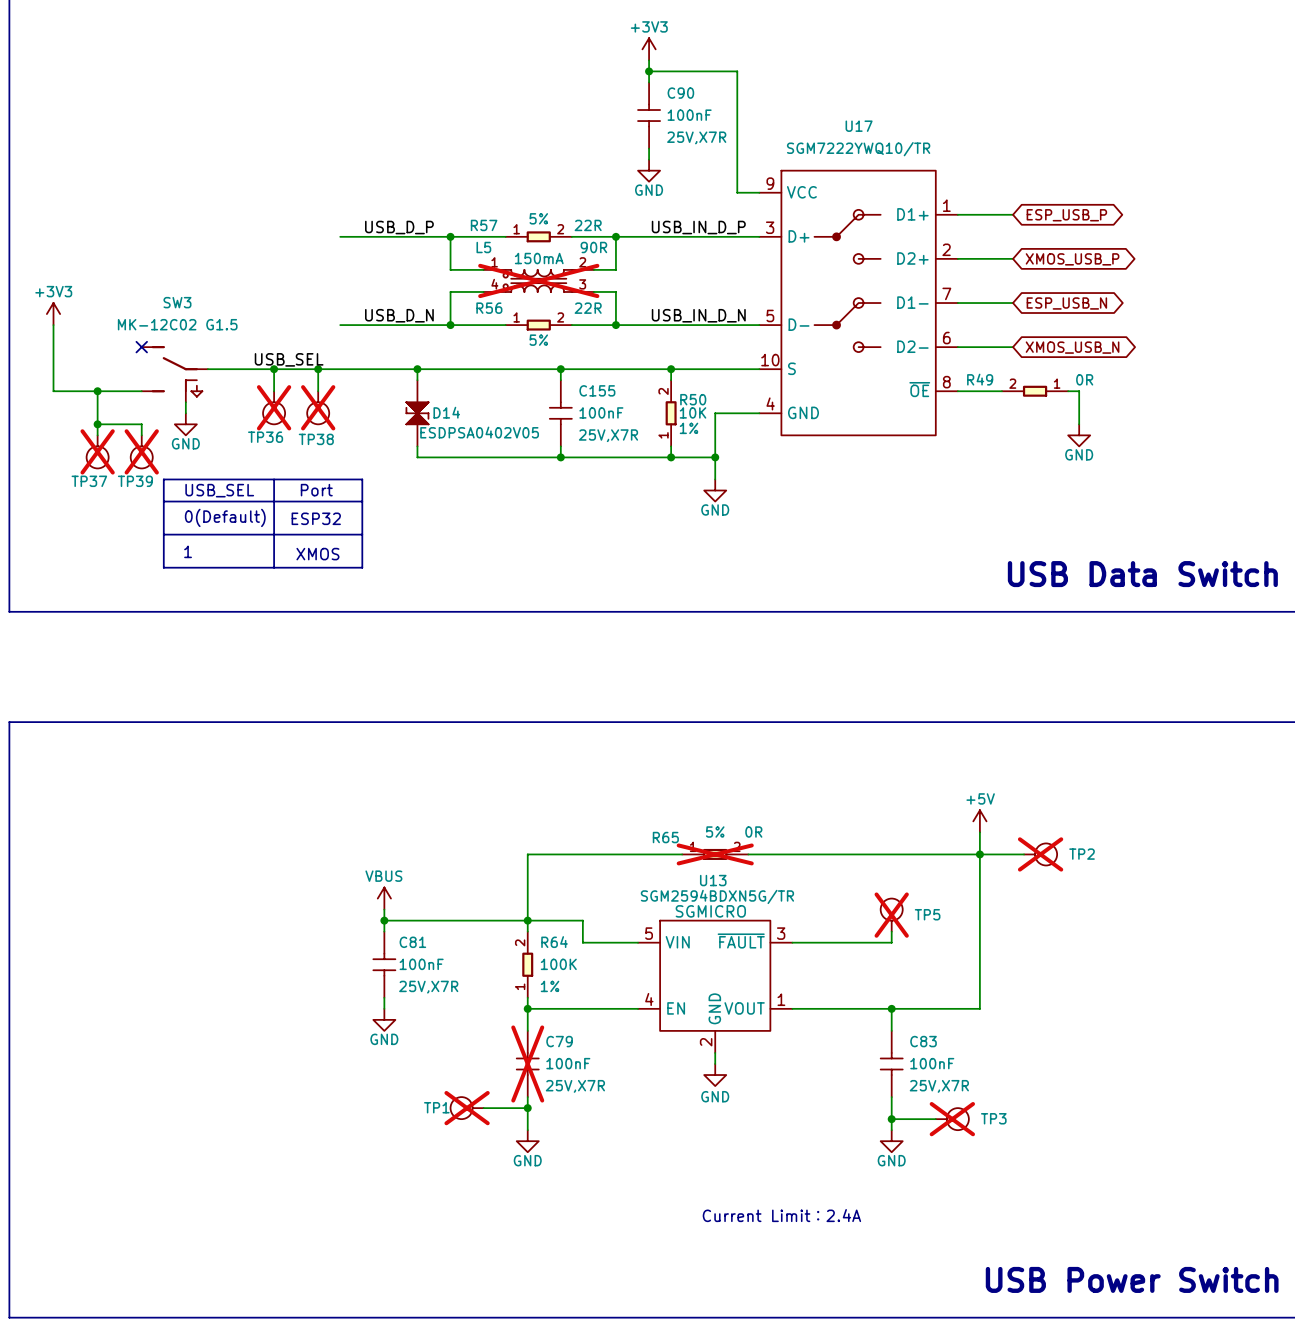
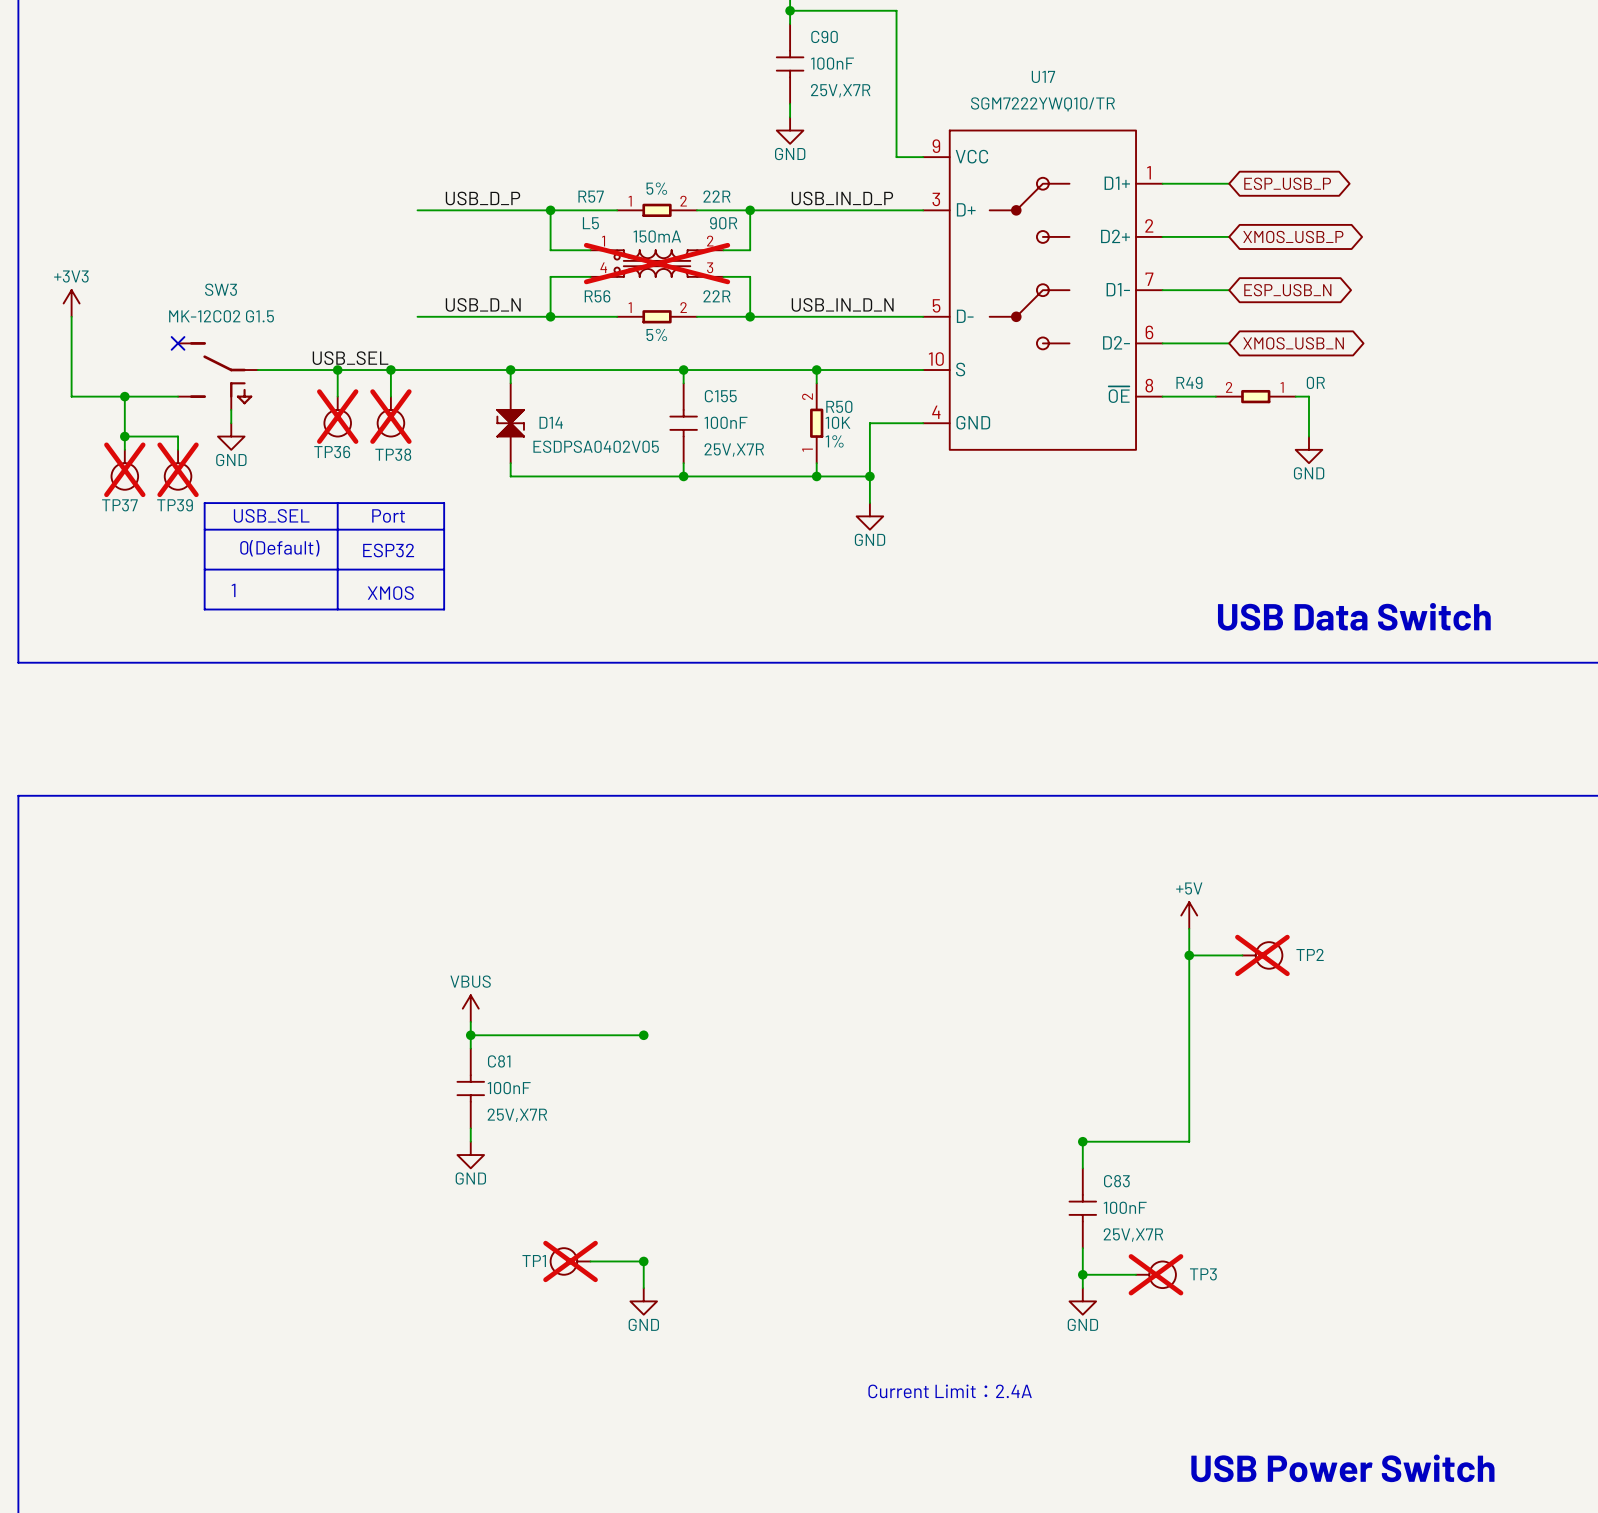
wire: (682, 854) (527, 854) (527, 931) -> none
R65: 0R (715, 854) -> none
wire: (748, 854) (979, 854) -> none
TP5: (891, 915) -> none
wire: (527, 920) (582, 920) (582, 942) (638, 942) -> none
wire: (891, 931) (891, 942) (792, 942) -> none
R64: 100K (527, 964) -> none
U13: SGM2594BDXN5G/TR (715, 986) -> none
wire: (527, 997) (527, 1030) -> none
wire: (527, 1008) (638, 1008) -> none
junction: (527, 1008) -> none
wire: (792, 1008) (891, 1008) -> none
wire: (715, 1052) (715, 1064) -> none
C79: 100nF (527, 1064) -> none
power symbol: GND (715, 1075) -> none
wire: (527, 1097) (527, 1108) -> none

